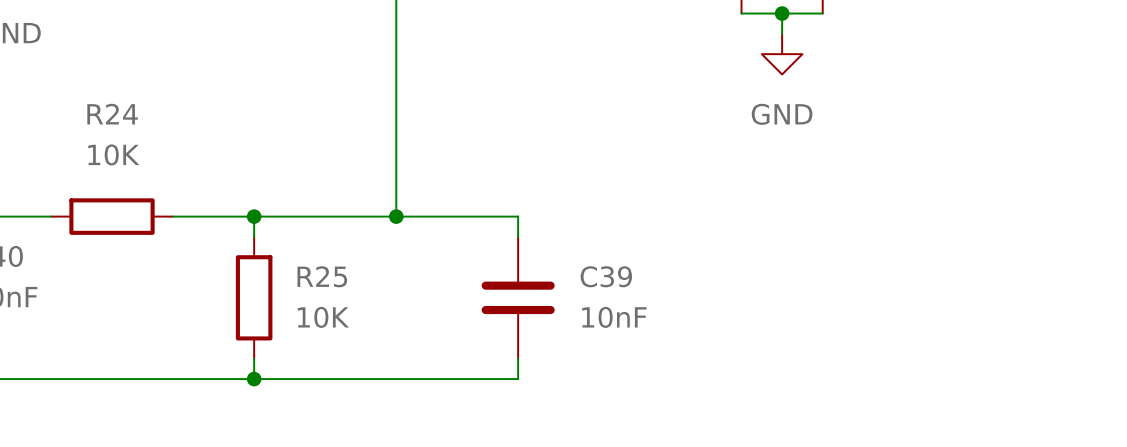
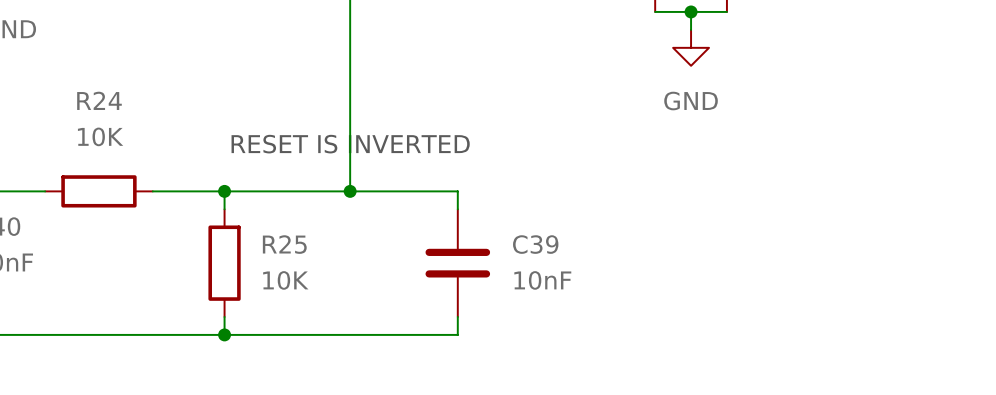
text: none -> RESET IS INVERTED (350, 144)

